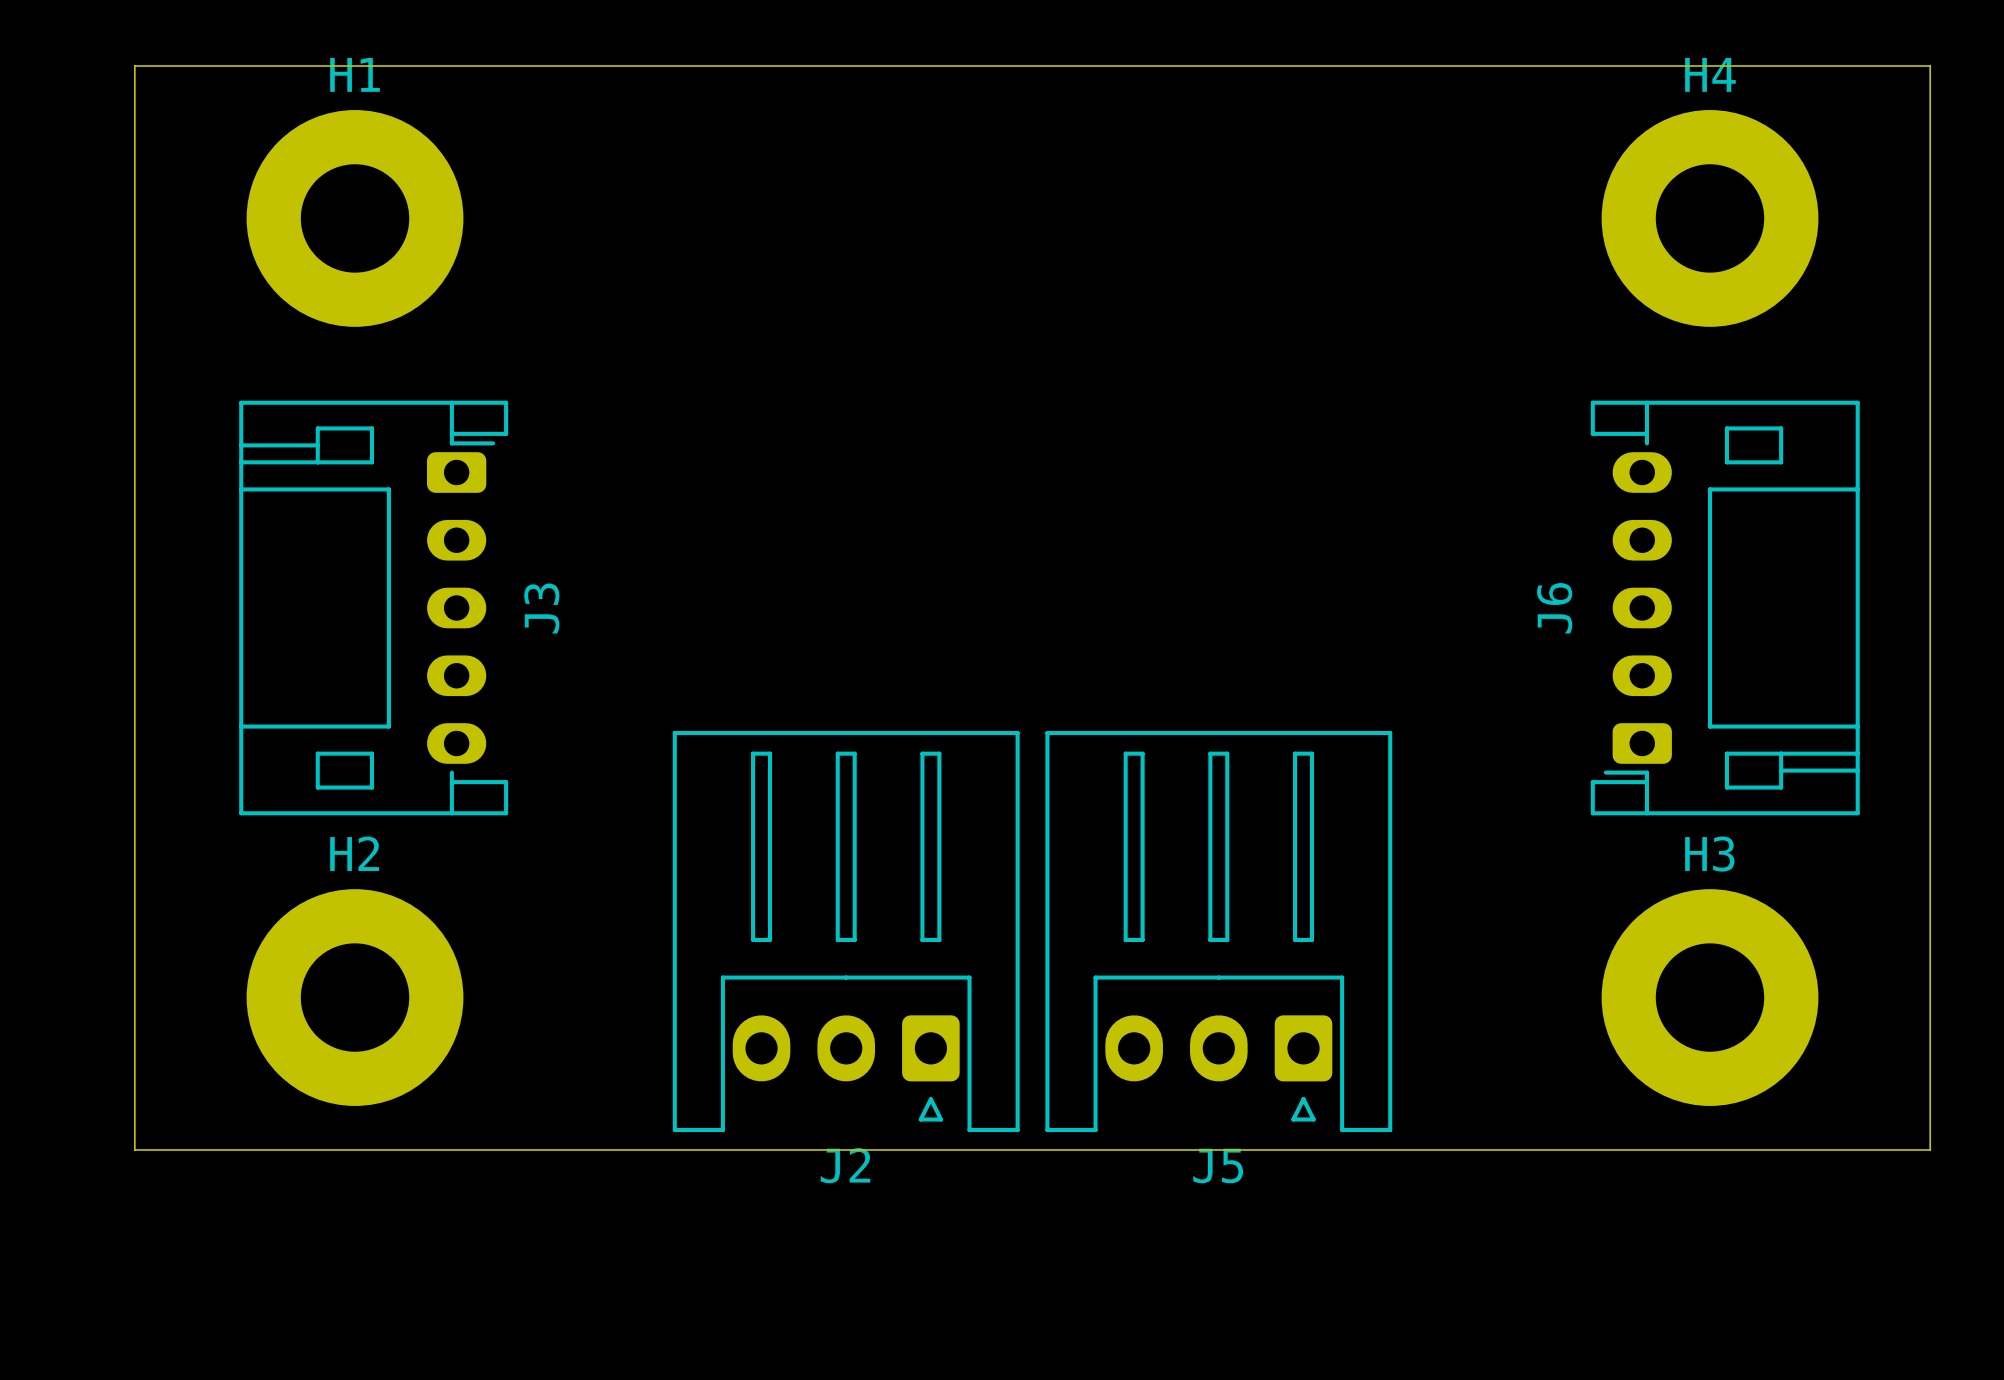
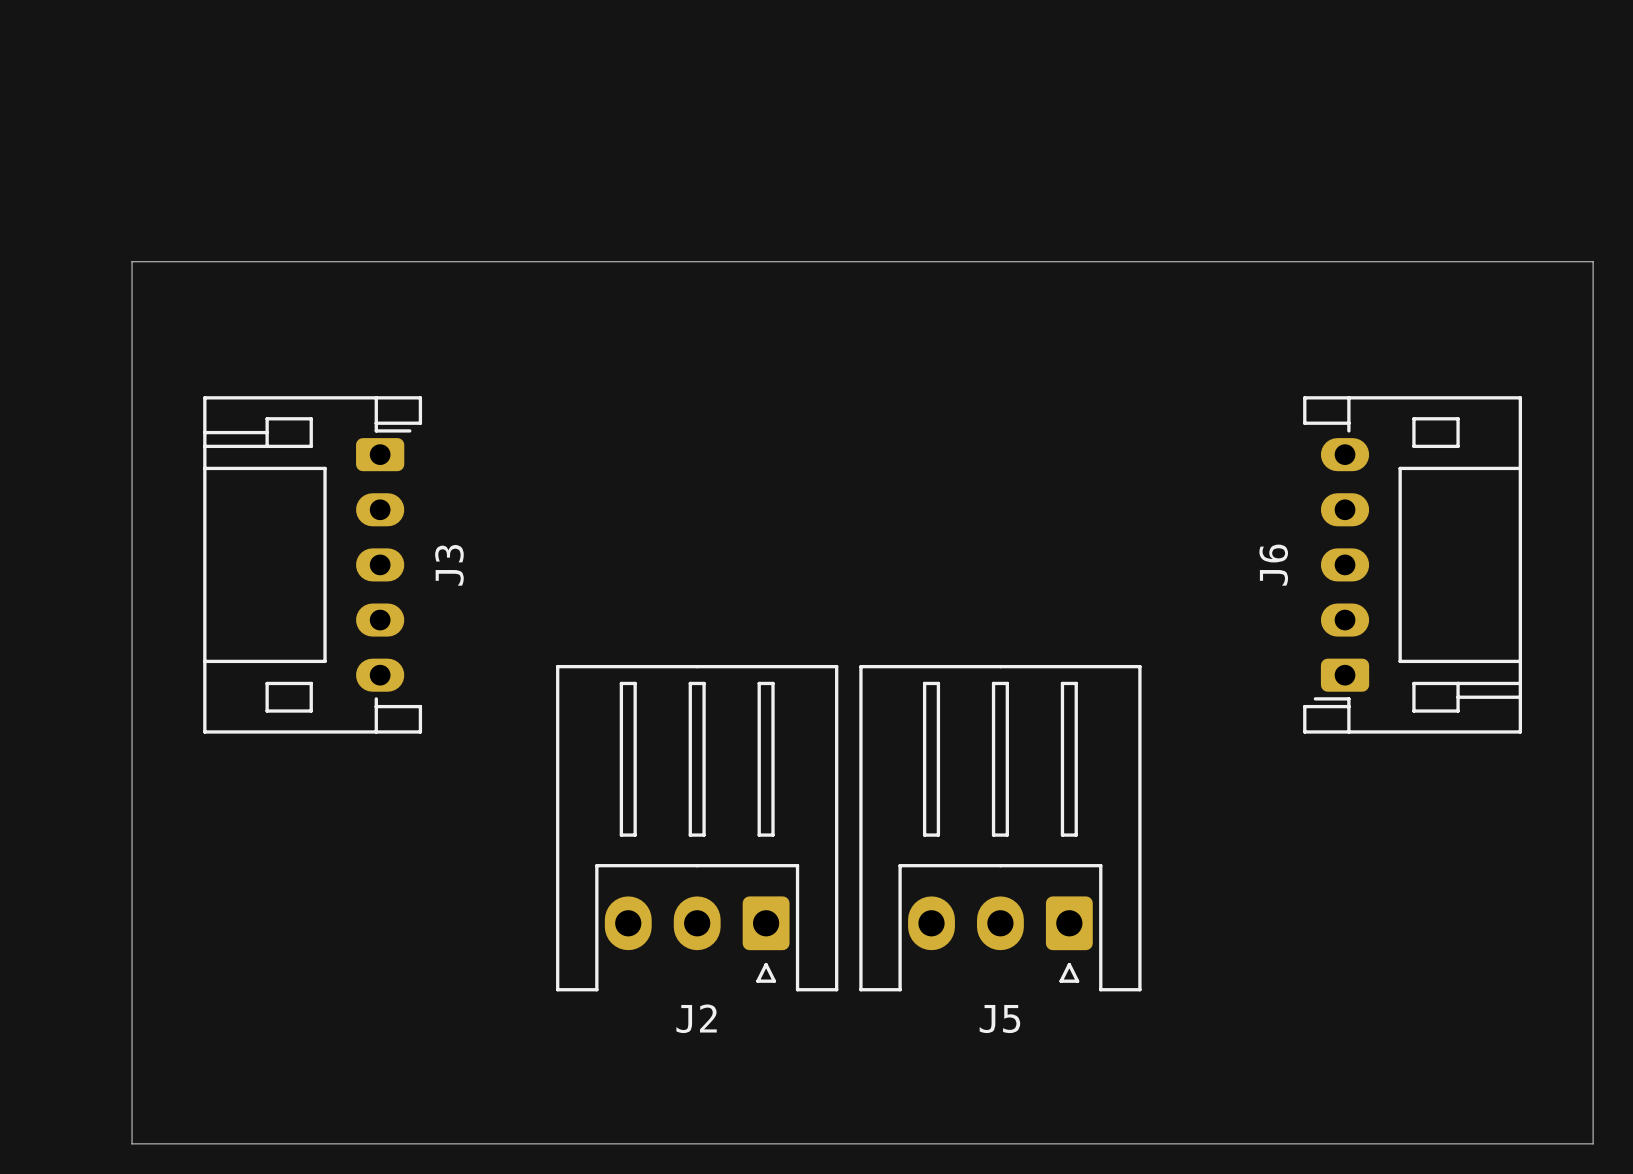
board edge: (134, 66) (134, 1149) (1930, 1149) (1930, 66) (134, 66) -> (132, 261) (132, 1143) (1593, 1143) (1593, 261) (132, 261)
H1: (355, 218) -> none
H4: (1710, 218) -> none
H2: (355, 997) -> none
H3: (1710, 997) -> none

